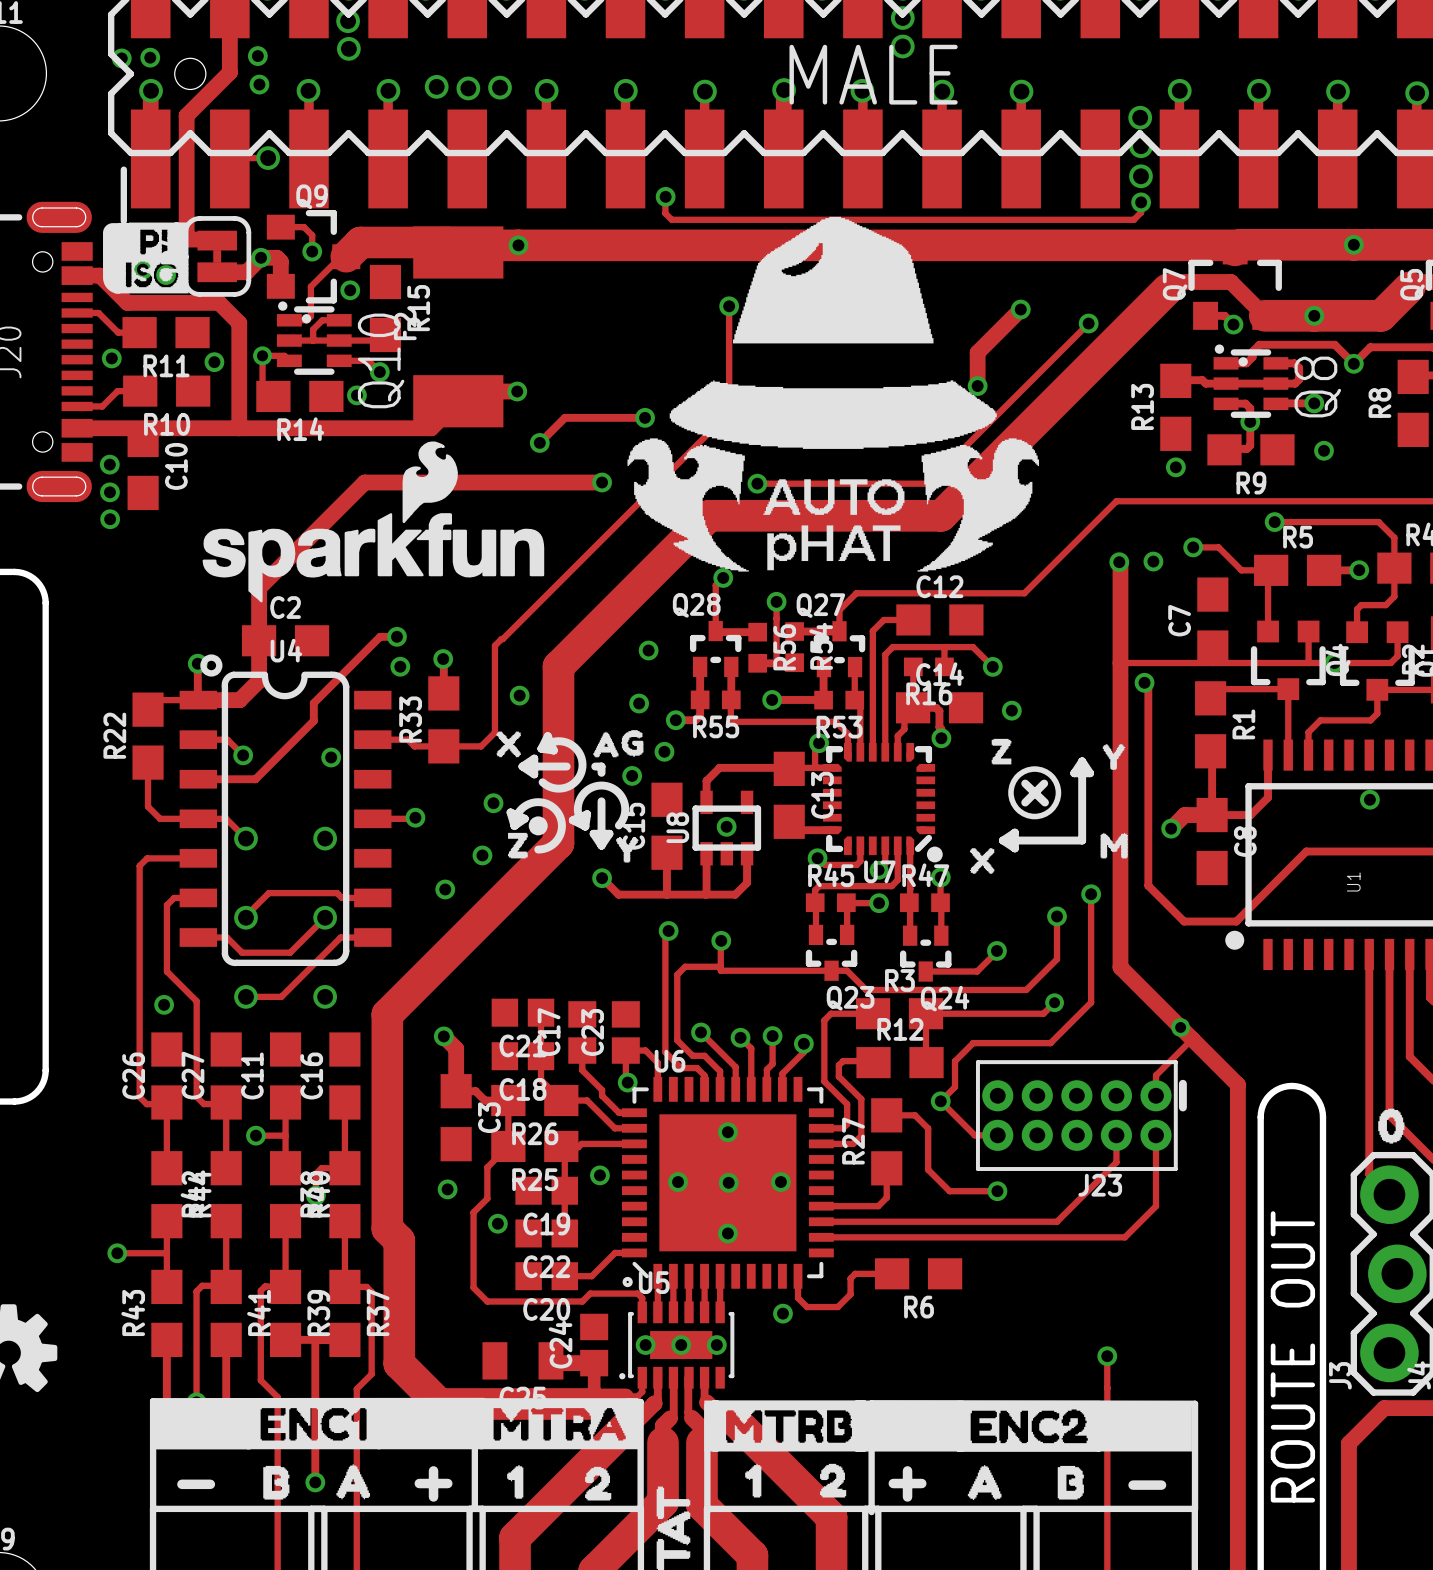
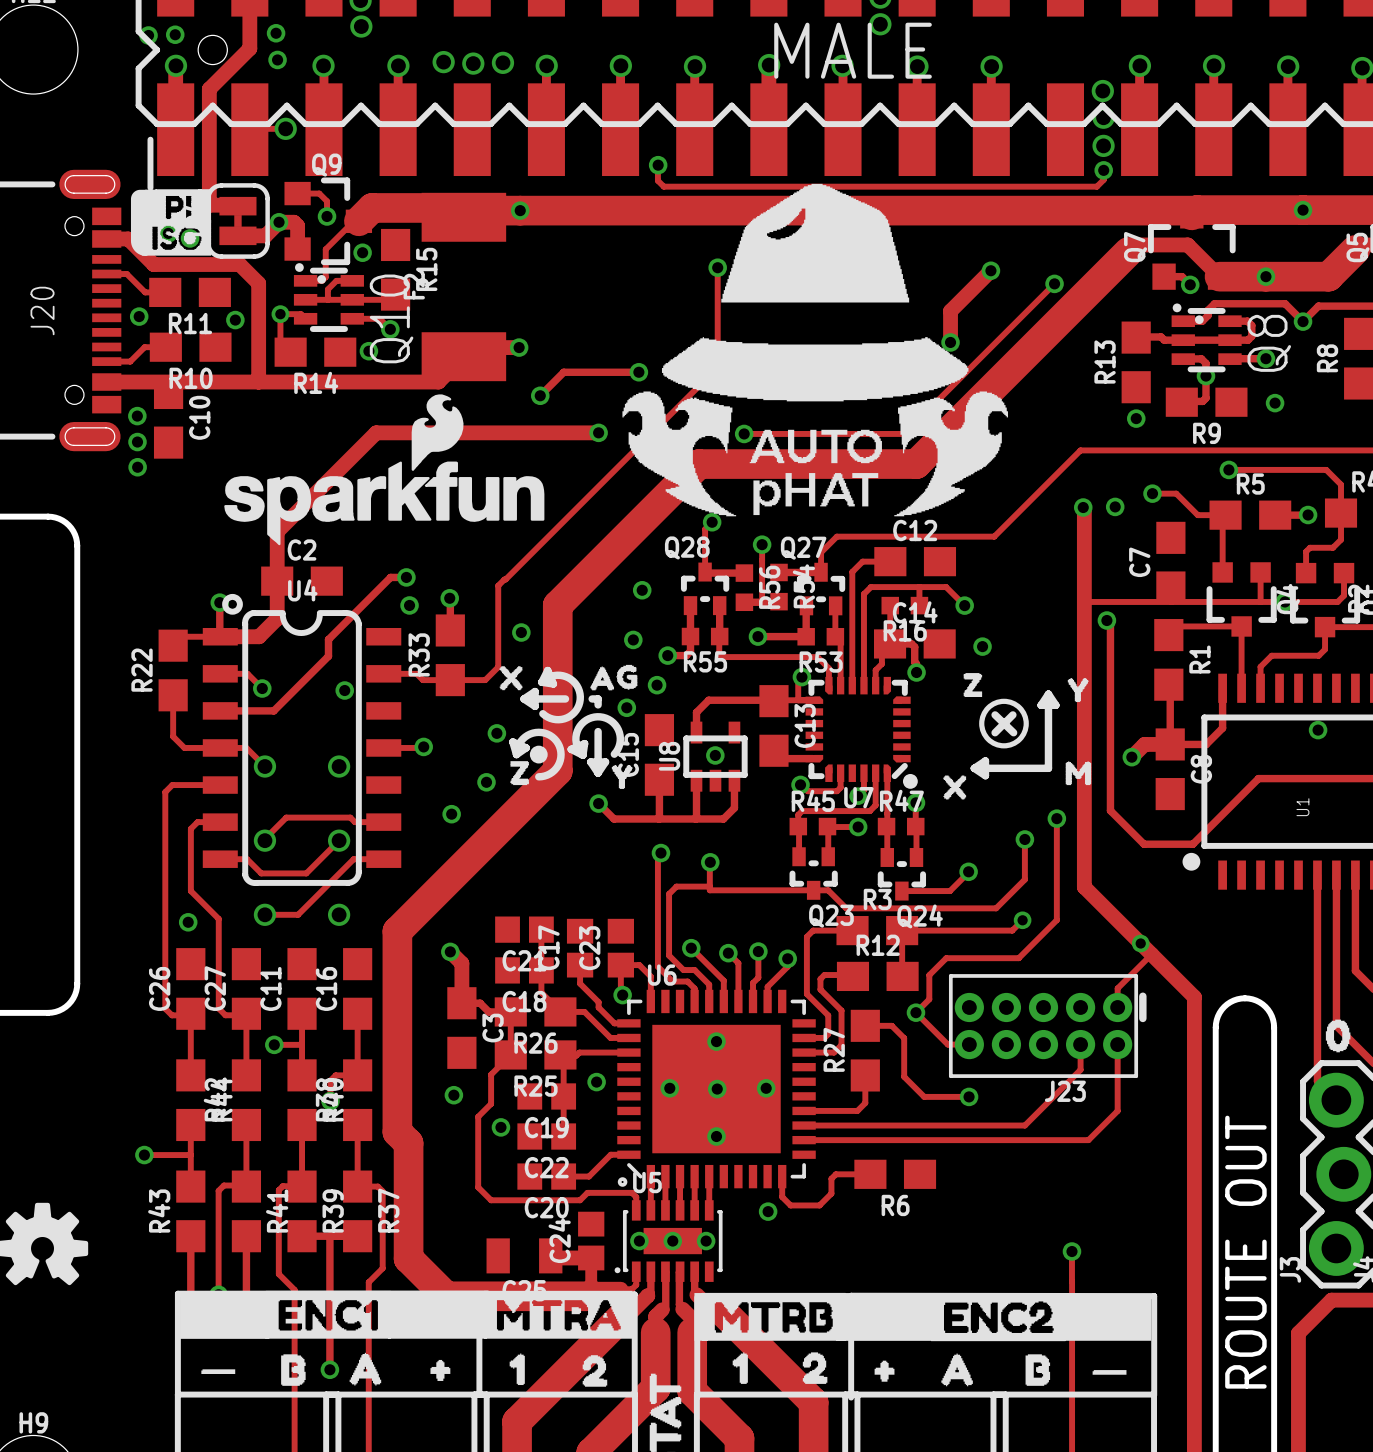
line: (433, 1470) (433, 1496) -> none
line: (907, 1470) (907, 1496) -> none
drawing: none -> [430, 1359, 451, 1381]
drawing: none -> [874, 1360, 895, 1382]
drawing: none -> [201, 1369, 236, 1374]
drawing: none -> [1092, 1370, 1127, 1375]
line: (419, 1483) (447, 1483) -> none
line: (893, 1483) (921, 1483) -> none
line: (181, 1484) (210, 1484) -> none
line: (1133, 1485) (1161, 1485) -> none

